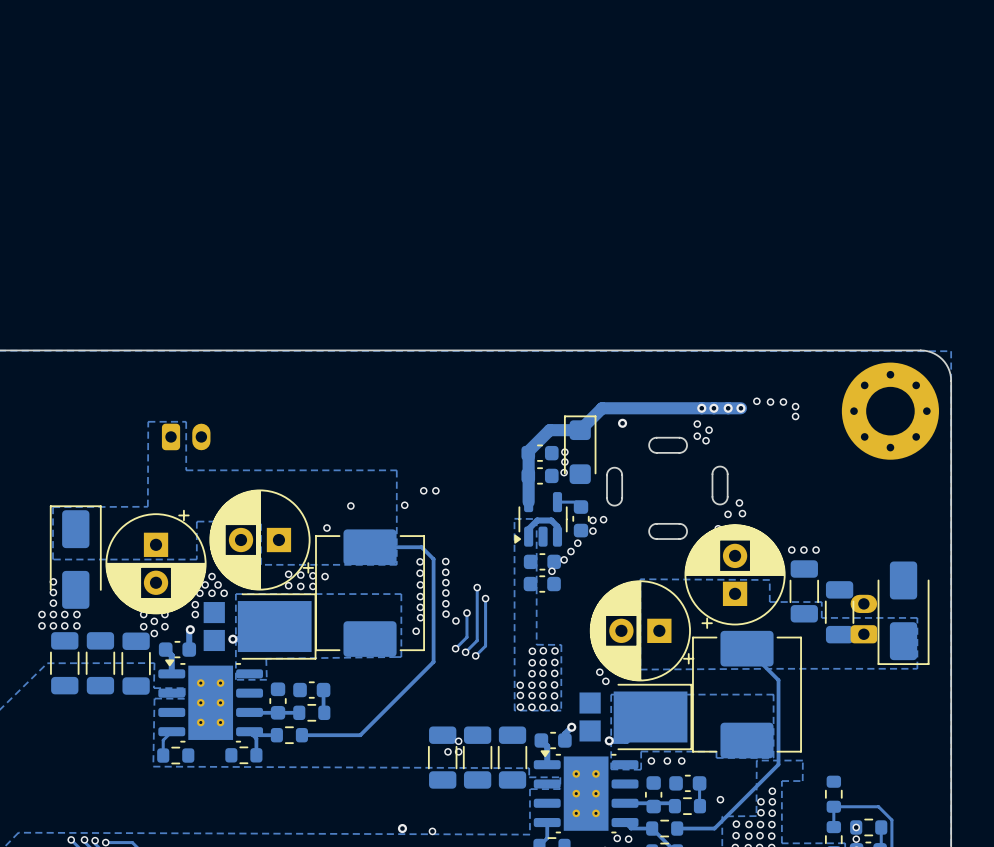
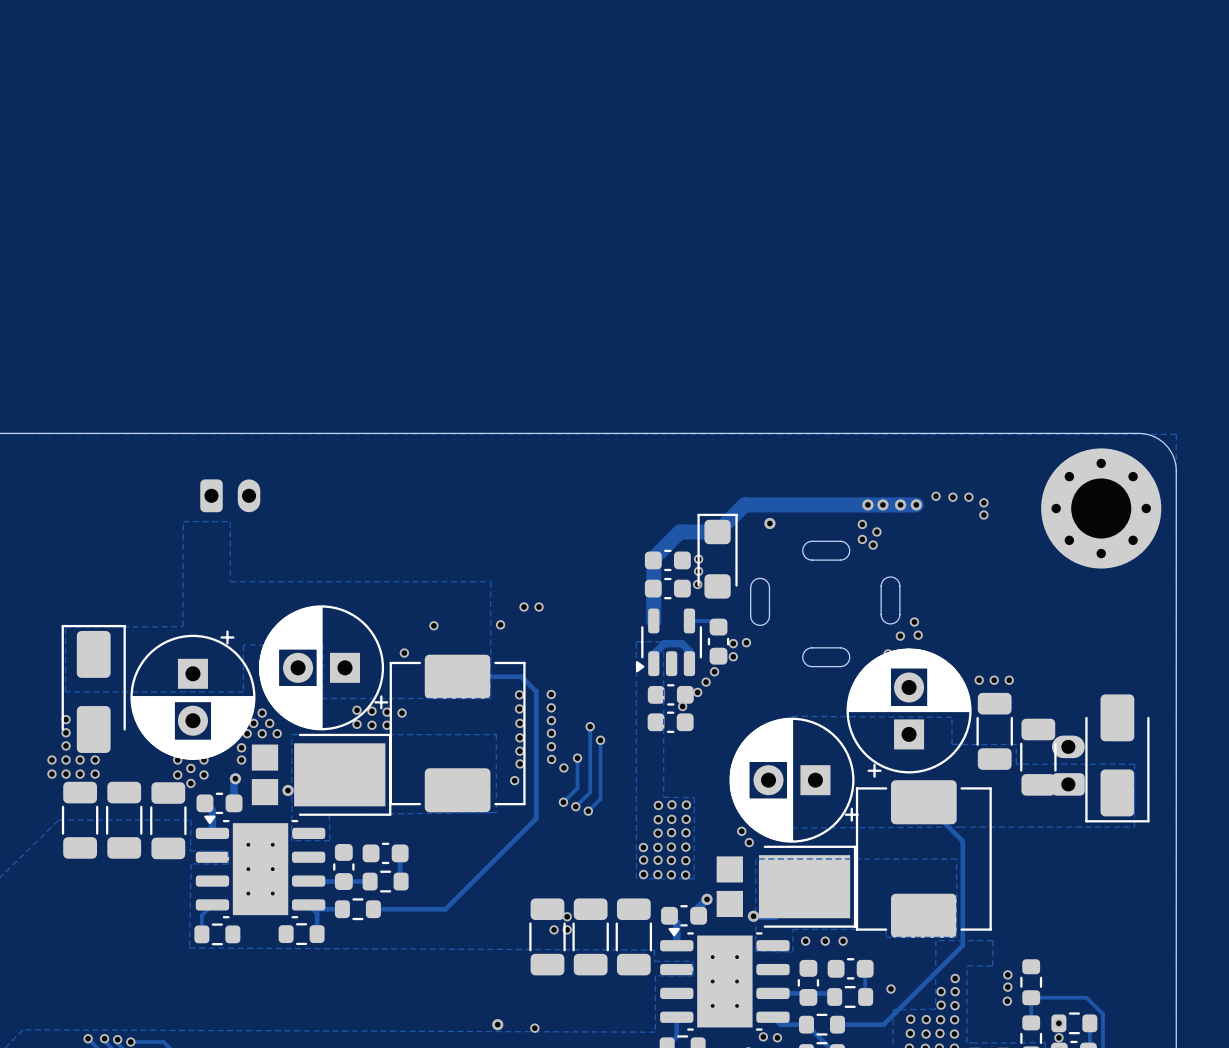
part position: (186, 436) -> (230, 495)
via: none -> (1007, 974)
via: none -> (1007, 987)
via: none -> (1007, 1001)

